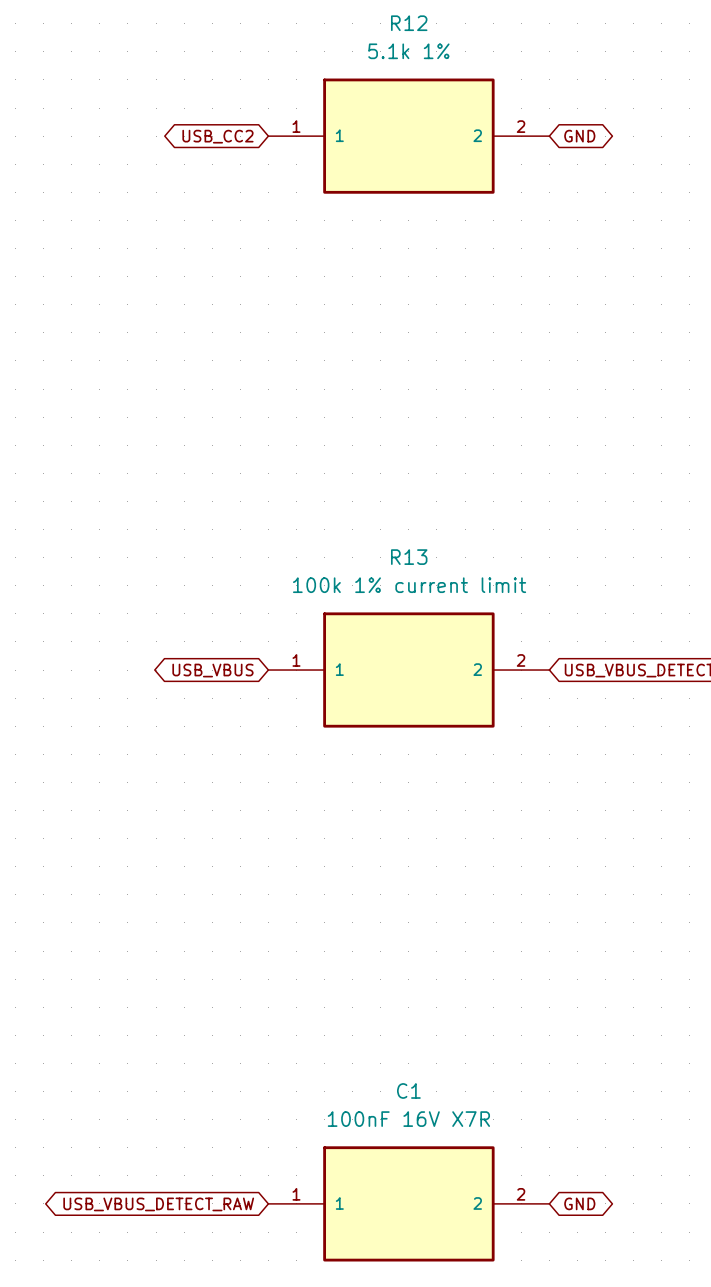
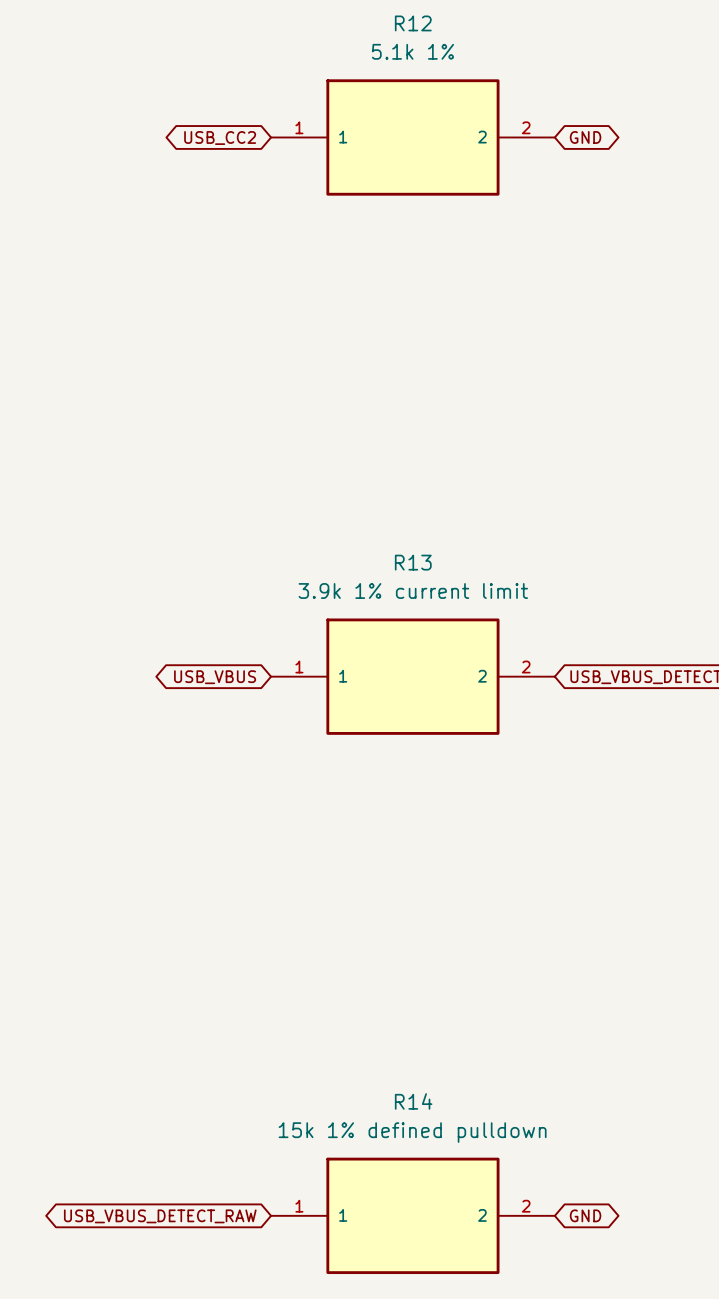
R13 value: 100k 1% current limit (409, 585) -> 3.9k 1% current limit (413, 591)
C1 name: C1 (408, 1090) -> R14 (413, 1101)
C1 value: 100nF 16V X7R (408, 1119) -> 15k 1% defined pulldown (412, 1132)

